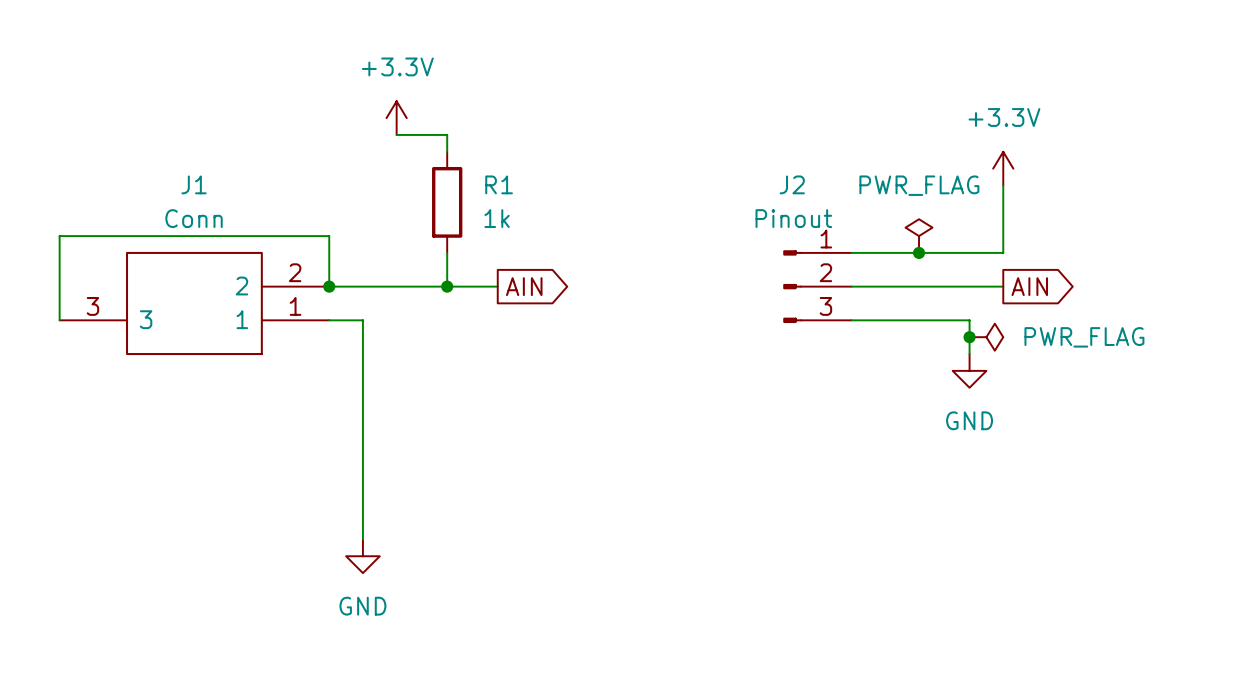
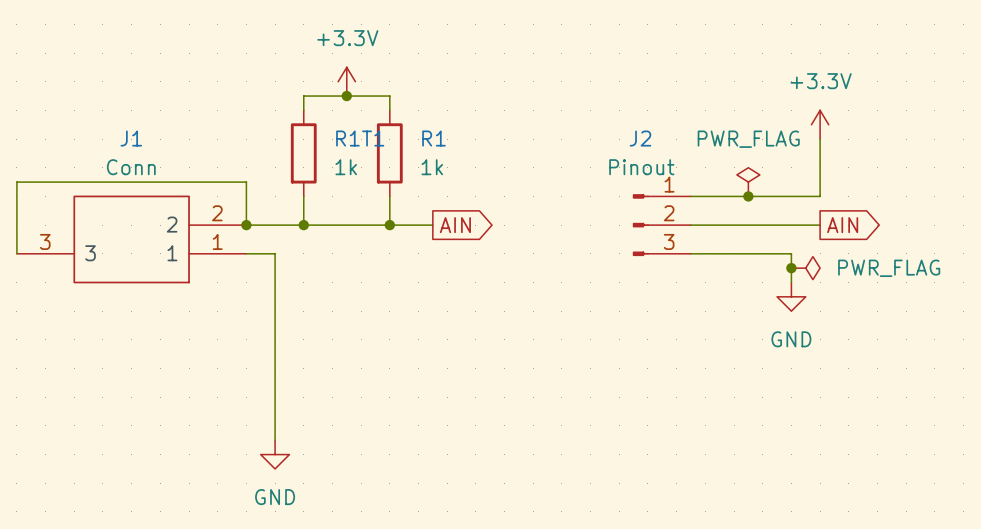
power symbol position: +3.3V (396, 118) -> +3.3V (346, 81)
wire: none -> (303, 96) (303, 110)
wire: (447, 134) (447, 151) -> (346, 96) (389, 96) (389, 110)
junction: none -> (346, 96)
R1T1: none -> 1k (303, 153)
R1 position: (447, 202) -> (389, 153)
wire: (447, 252) (447, 286) -> (303, 196) (303, 225)
wire: none -> (389, 196) (389, 225) (432, 225)
junction: none -> (303, 225)
junction: (447, 286) -> none
junction: none -> (389, 225)
global label position: AIN (524, 286) -> AIN (455, 225)

